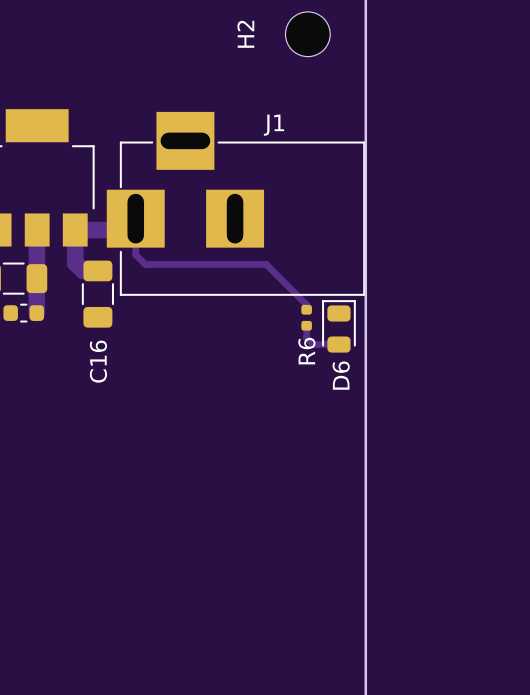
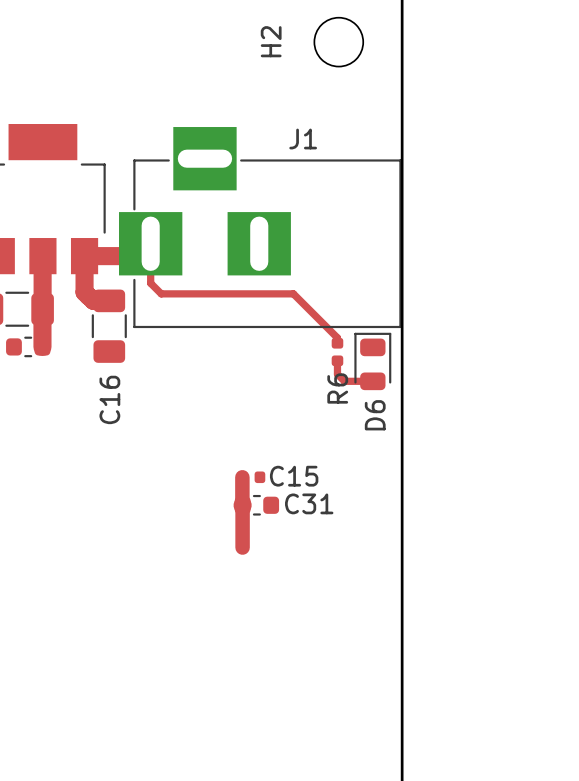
track: none -> (242, 477) (242, 505)
C15: none -> (251, 477)
track: none -> (242, 505) (242, 547)
C31: none -> (256, 505)

